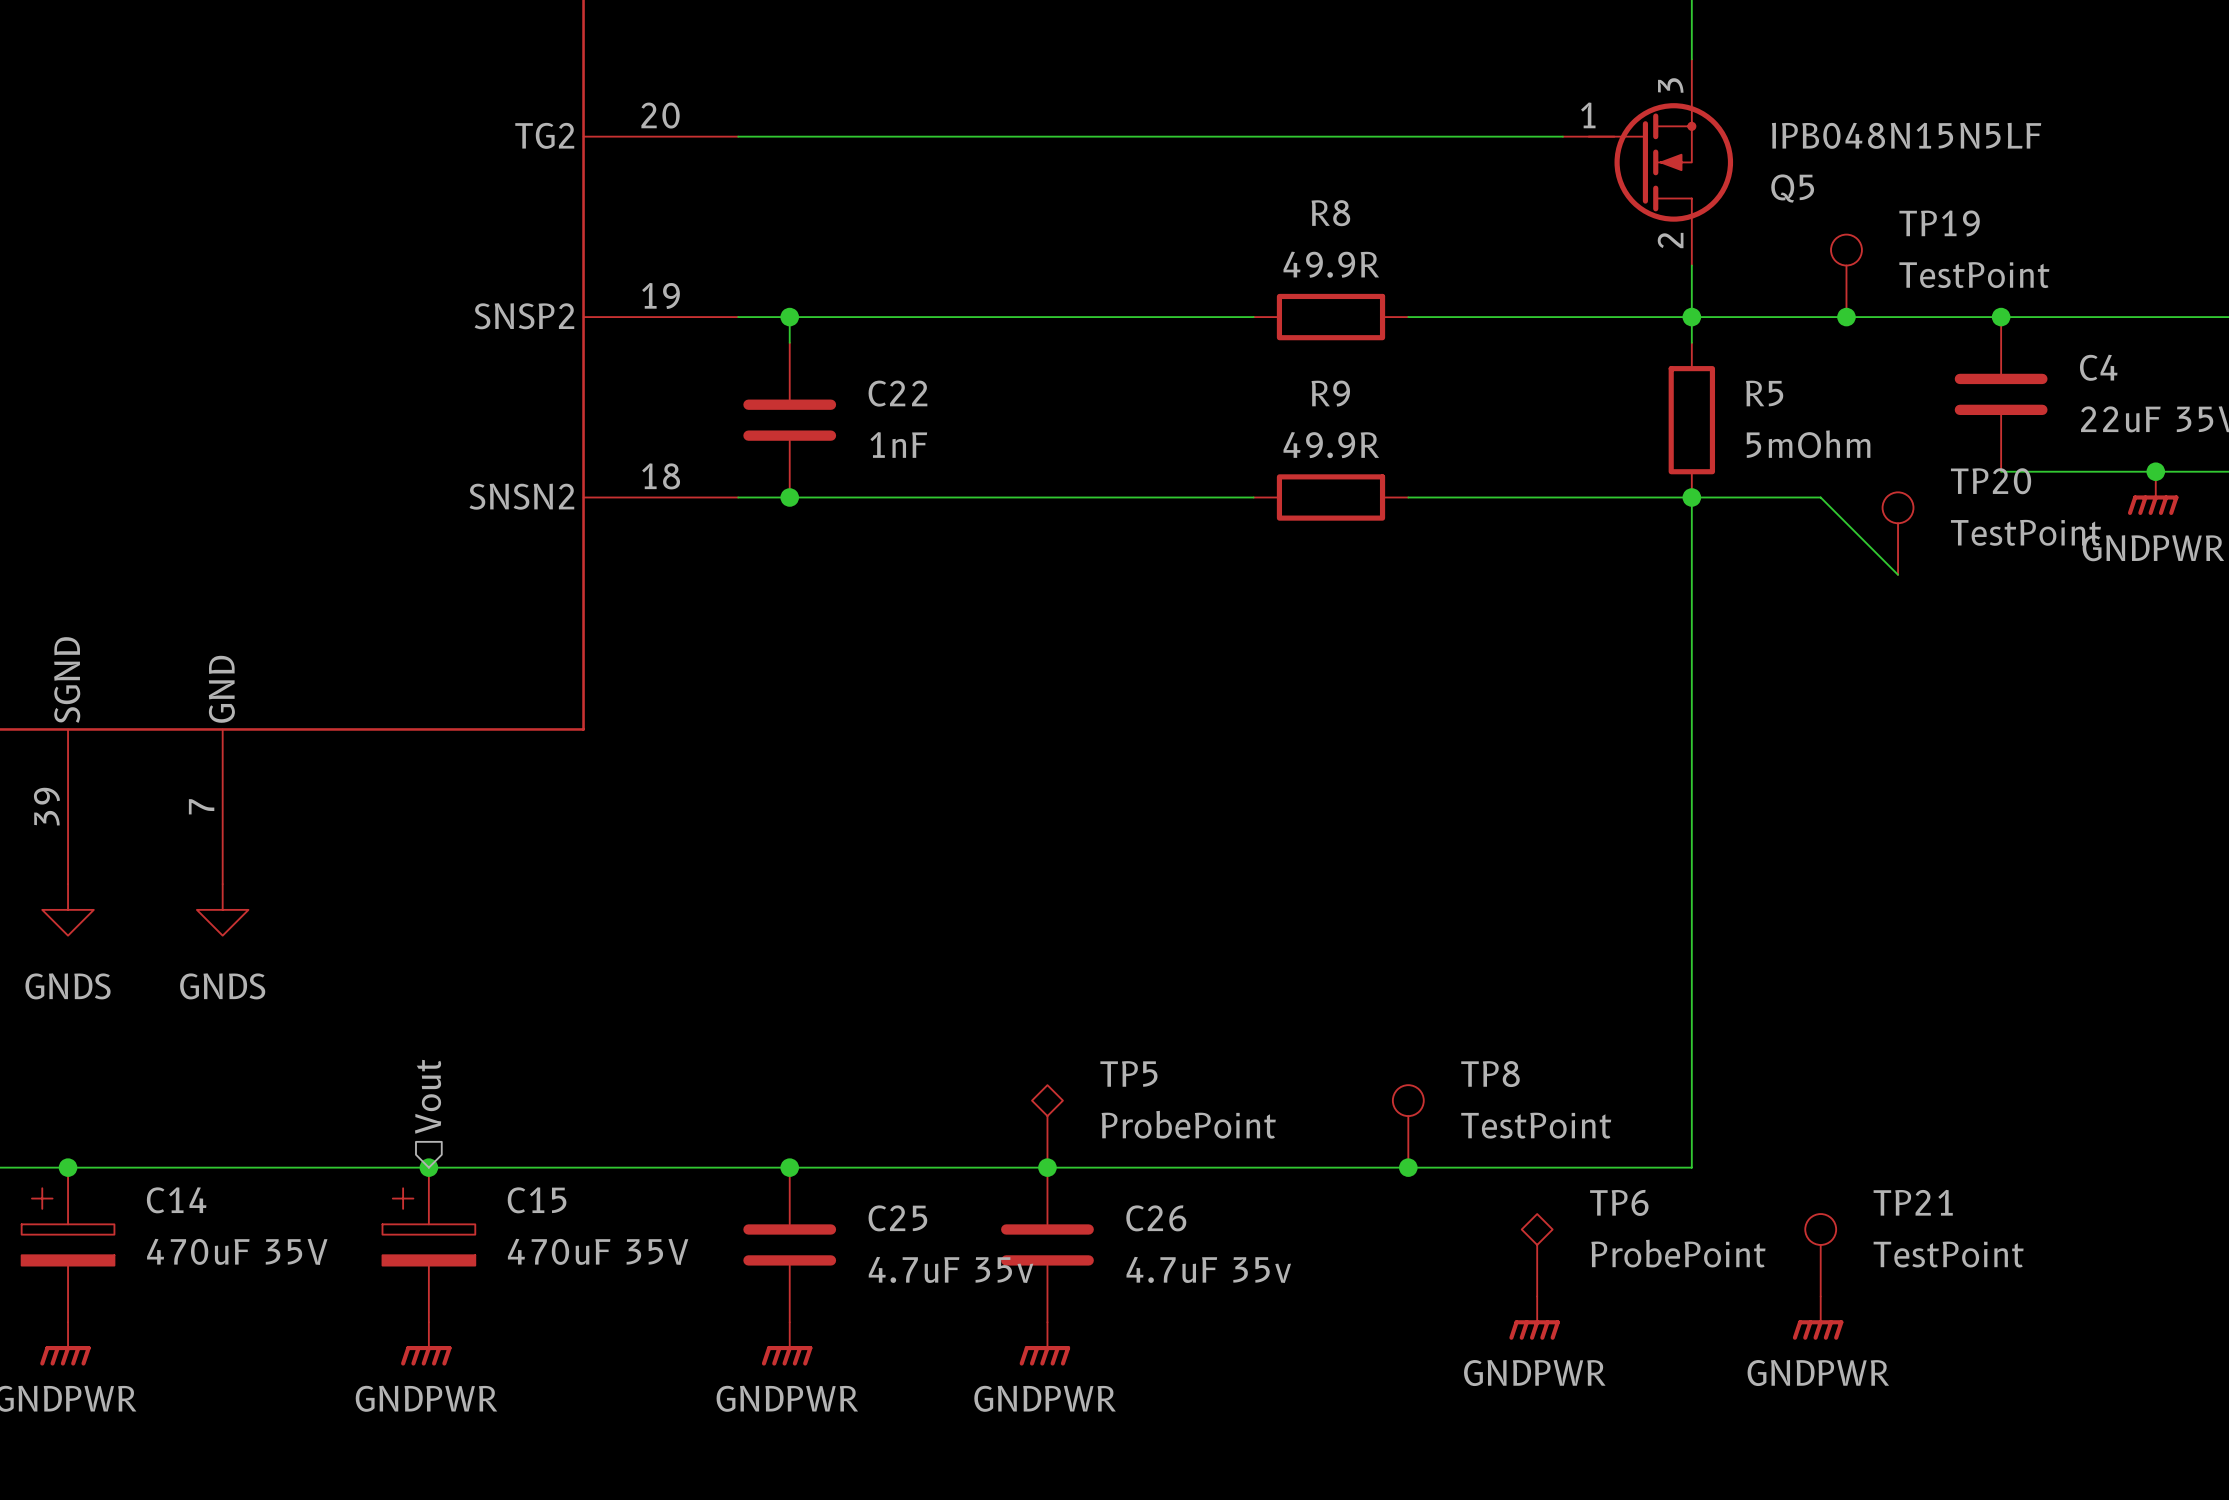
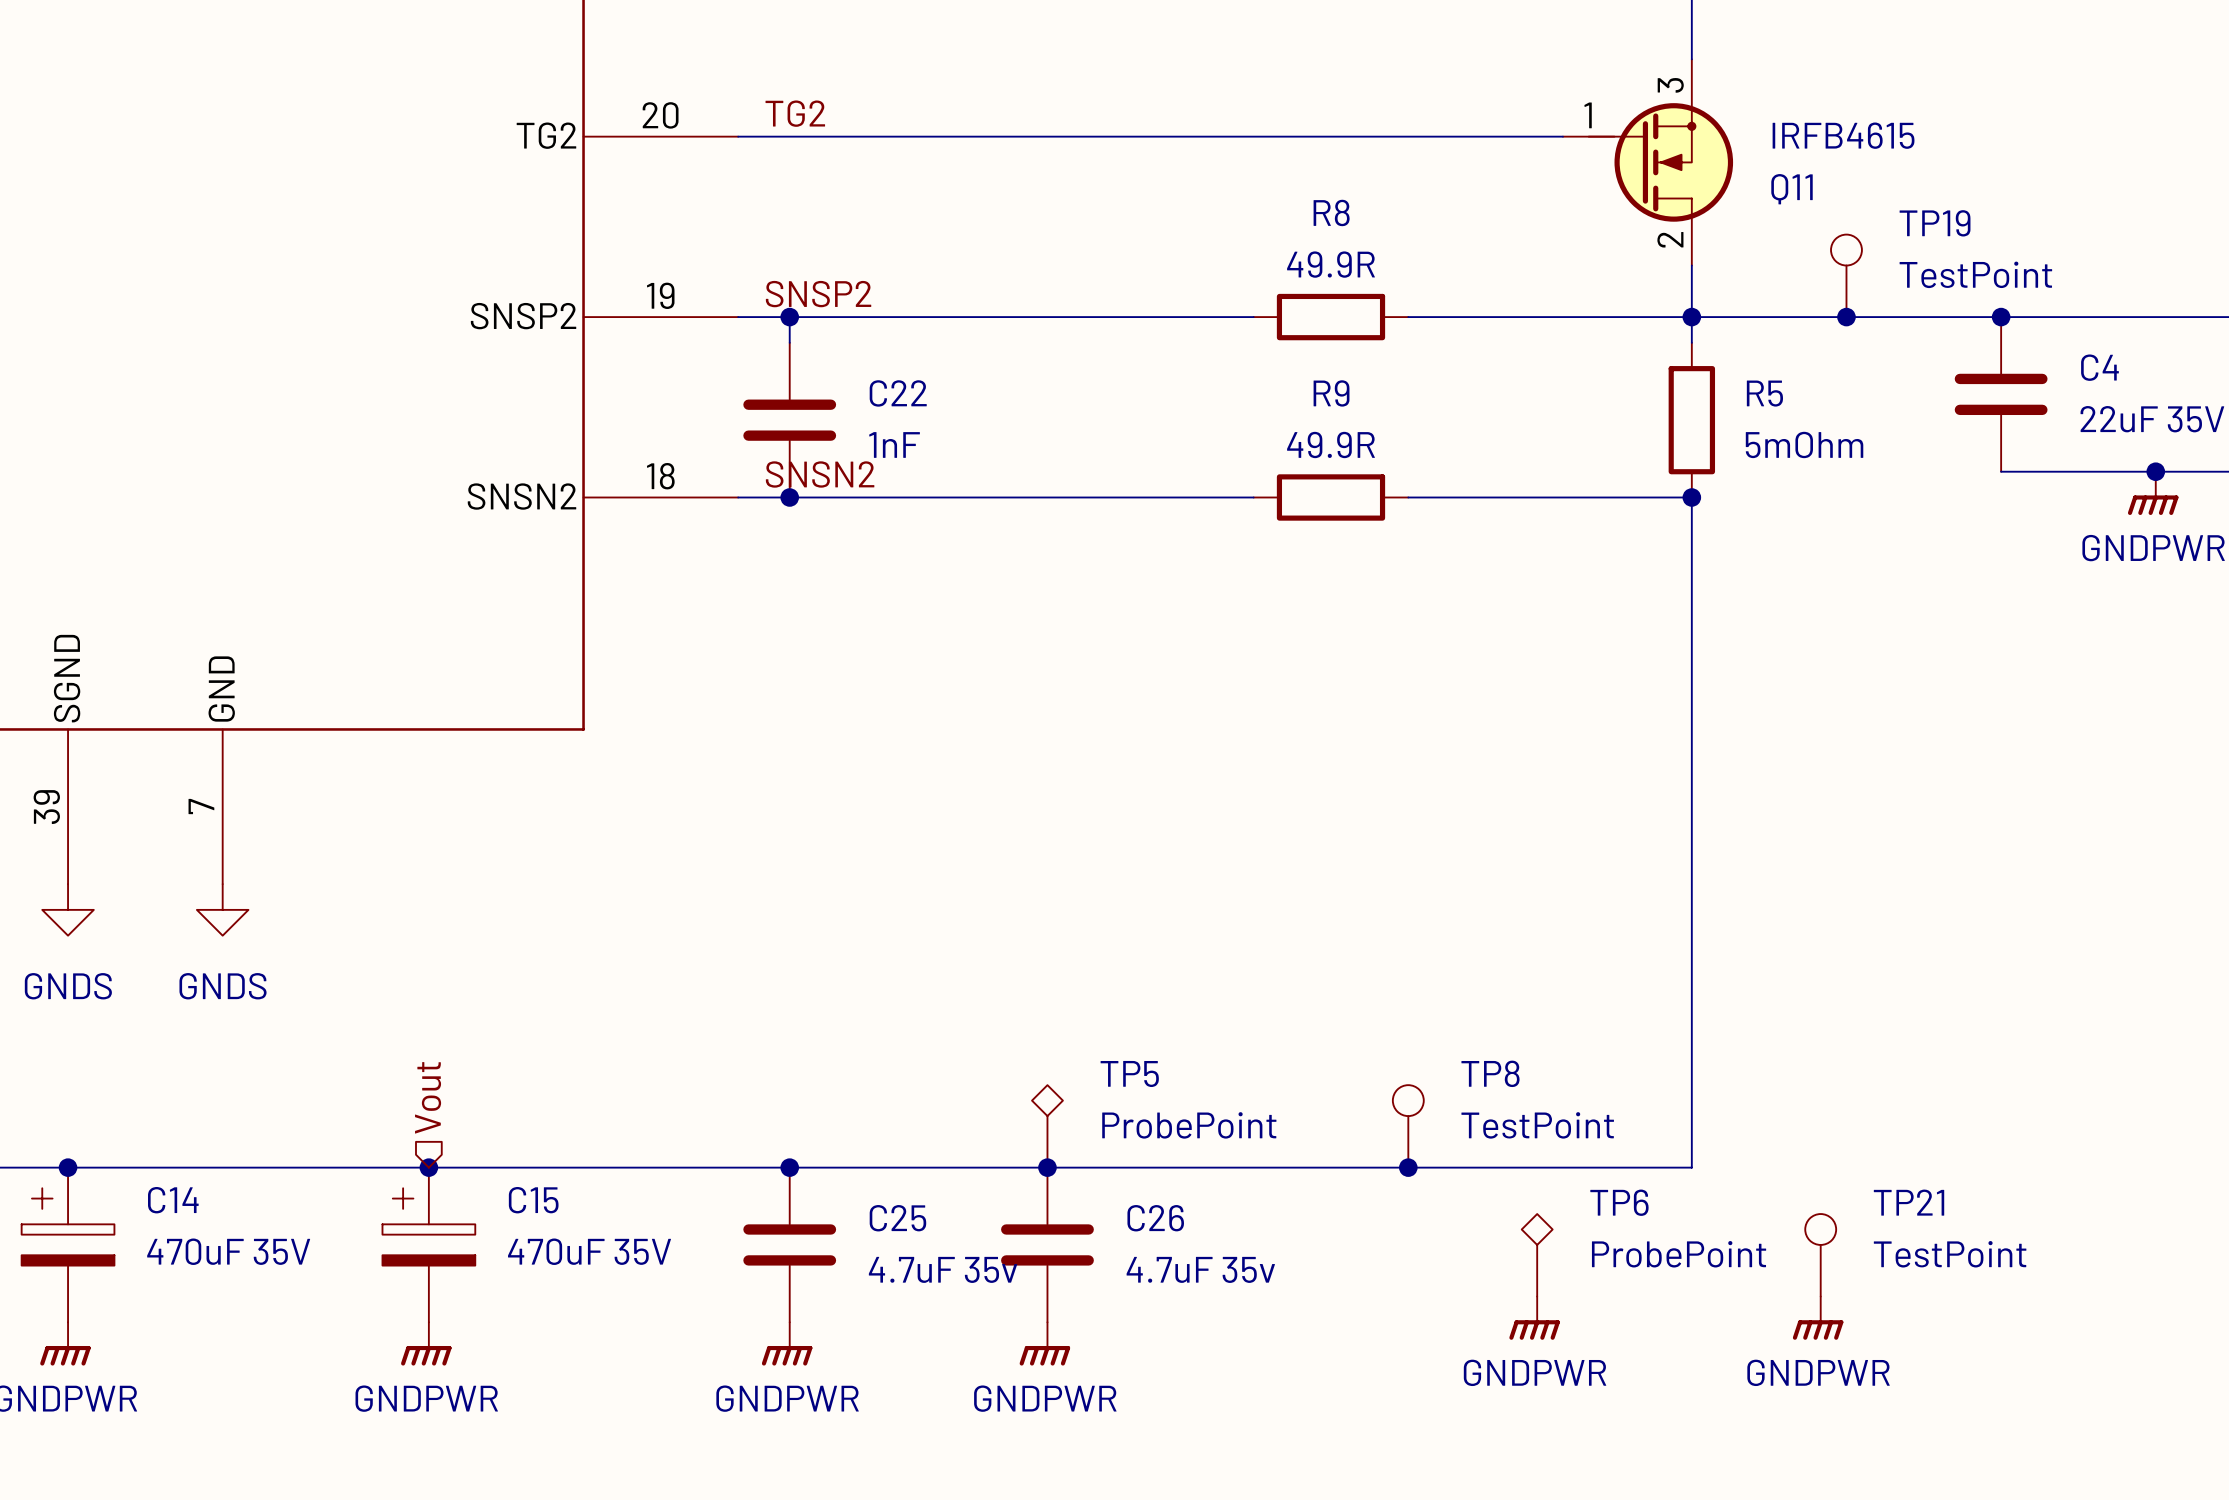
label: none -> TG2 (795, 113)
Q5 value: IPB048N15N5LF (1906, 135) -> IRFB4615 (1843, 135)
Q5 name: Q5 (1792, 188) -> Q11 (1792, 189)
label: none -> SNSP2 (818, 294)
label: none -> SNSN2 (820, 474)
wire: (1691, 497) (1820, 497) (1898, 574) -> none
TP20: TestPoint (1898, 533) -> none

